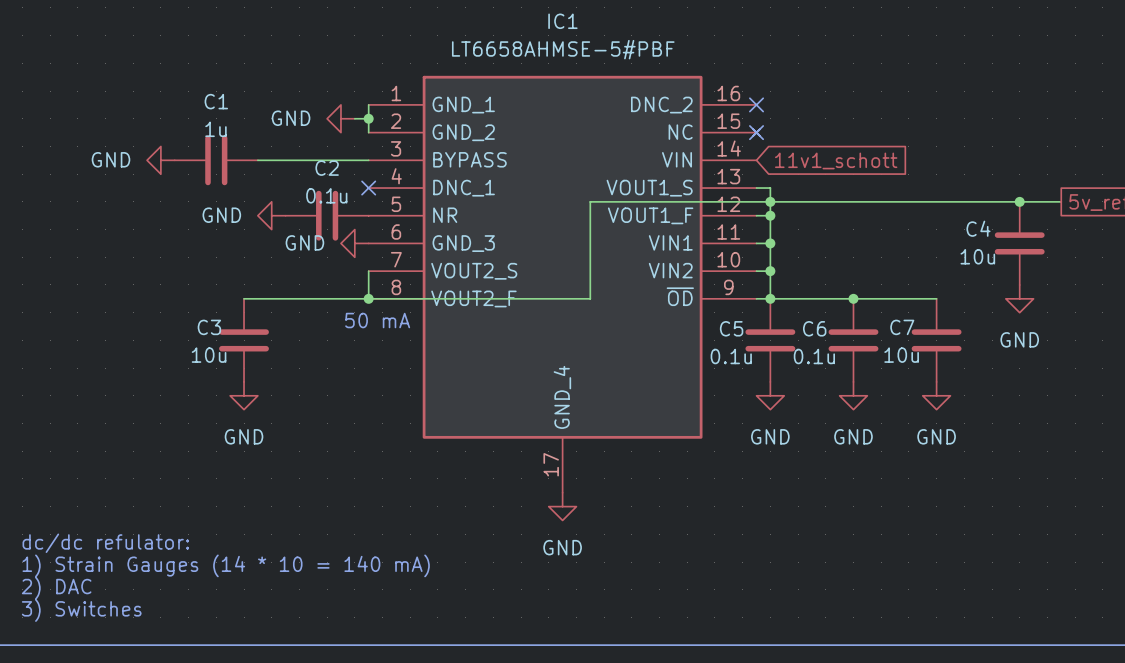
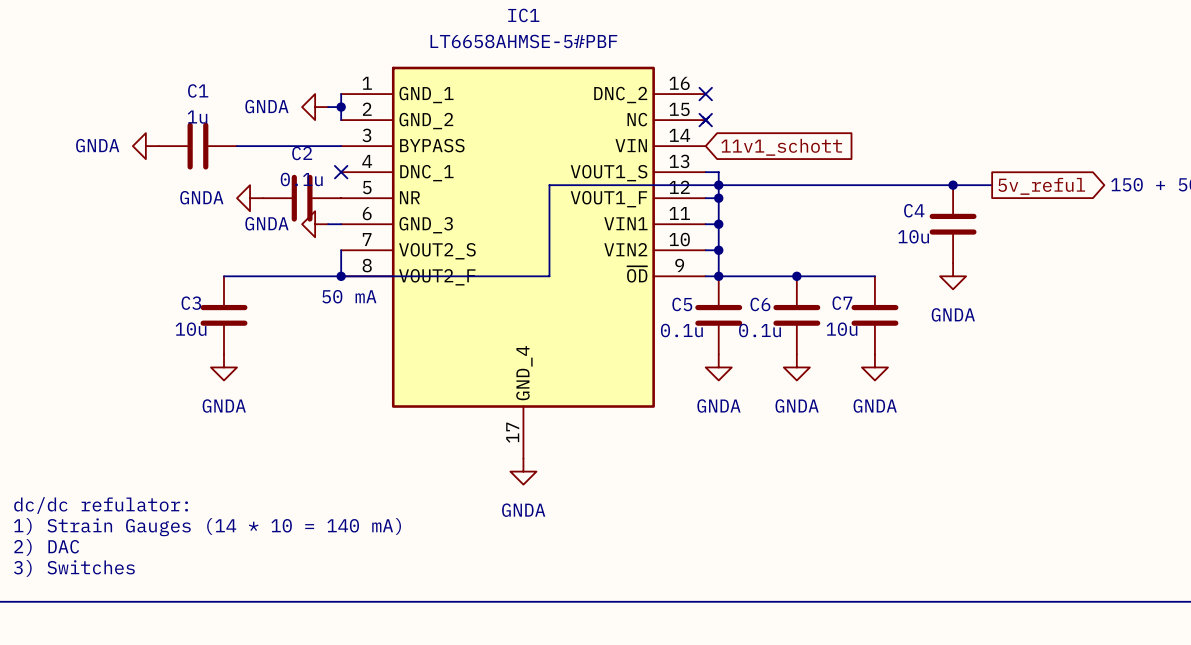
power symbol: GND (340, 118) -> GNDA (315, 107)
power symbol: GND (160, 160) -> GNDA (145, 146)
power symbol: GND (271, 215) -> GNDA (250, 198)
power symbol: none -> GNDA (315, 224)
power symbol: GND (354, 243) -> none
power symbol: GND (1019, 298) -> GNDA (953, 276)
power symbol: GND (244, 395) -> GNDA (223, 367)
power symbol: GND (770, 395) -> GNDA (718, 367)
power symbol: GND (853, 395) -> GNDA (796, 367)
power symbol: GND (936, 395) -> GNDA (874, 367)
power symbol: GND (562, 506) -> GNDA (523, 471)

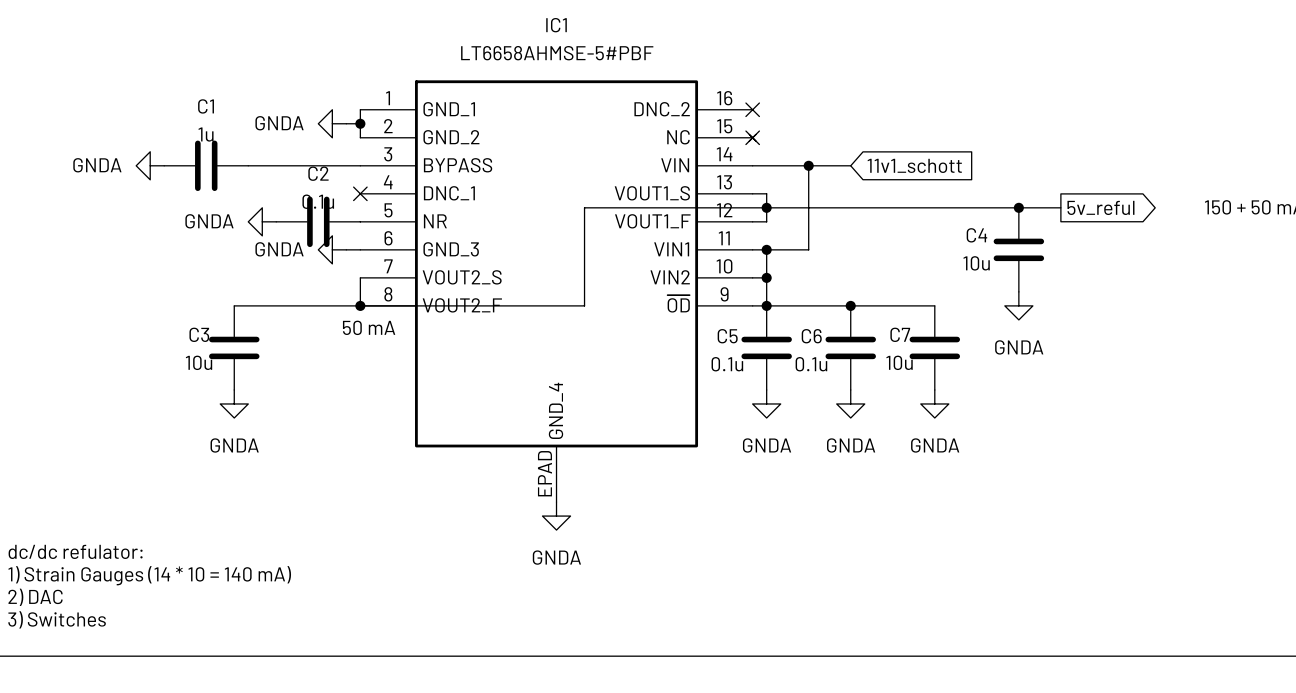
wire: none -> (752, 165) (850, 165)
junction: none -> (808, 165)
global label position: 11v1_schott (781, 147) -> 11v1_schott (914, 165)
wire: (718, 198) (718, 224) -> (808, 165) (808, 249) (766, 249)
junction: (718, 198) -> none
IC1 pin number: 17 (512, 432) -> EPAD (544, 473)

